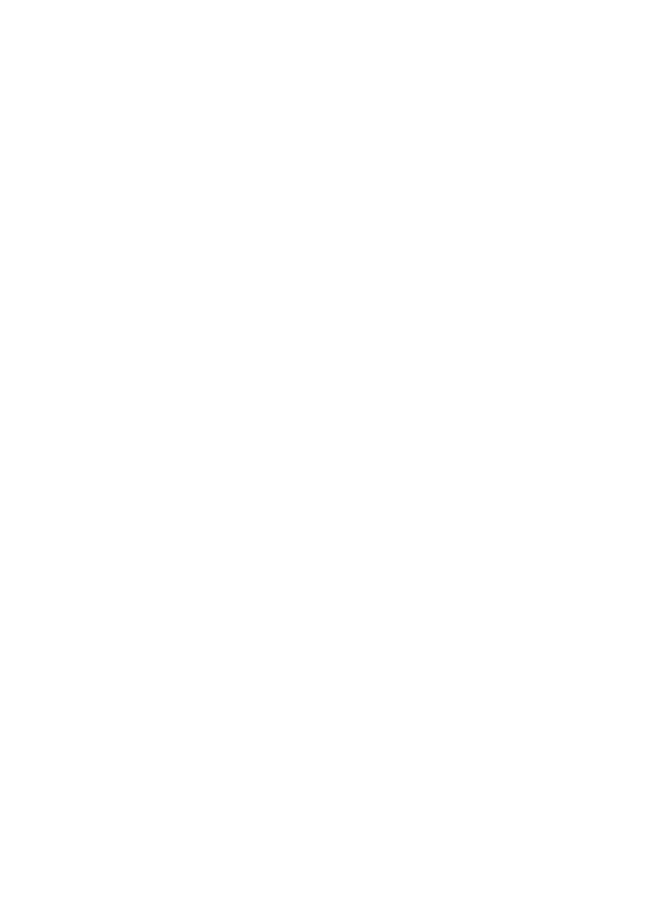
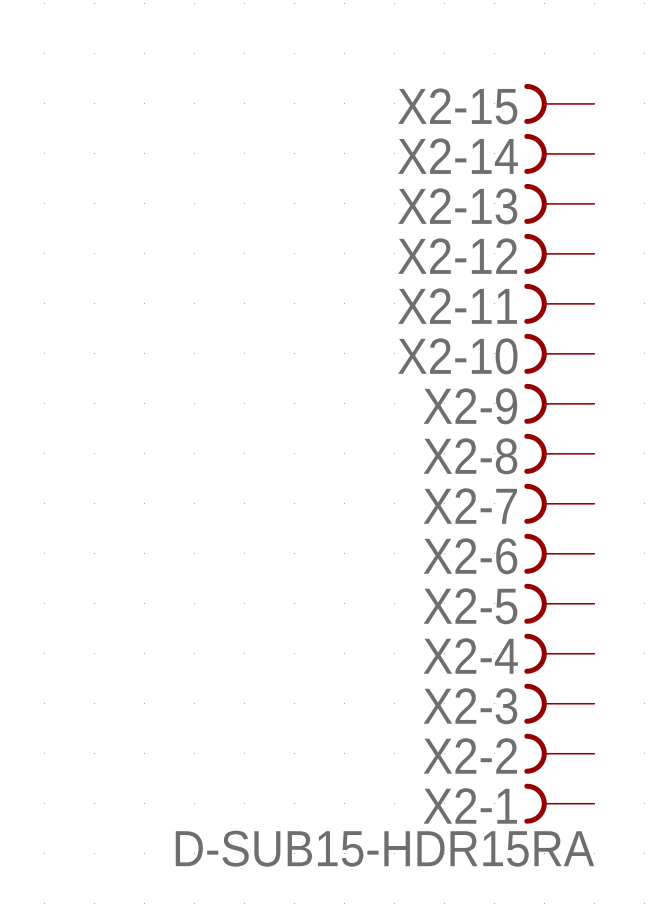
X2-15: none -> (559, 103)
X2-14: none -> (559, 153)
X2-13: none -> (559, 203)
X2-12: none -> (559, 253)
X2-11: none -> (559, 303)
X2-10: none -> (559, 353)
X2-9: none -> (559, 403)
X2-8: none -> (559, 453)
X2-7: none -> (559, 503)
X2-6: none -> (559, 553)
X2-5: none -> (559, 603)
X2-4: none -> (559, 653)
X2-3: none -> (559, 703)
X2-2: none -> (559, 753)
X2-1: none -> D-SUB15-HDR15RA (559, 803)

